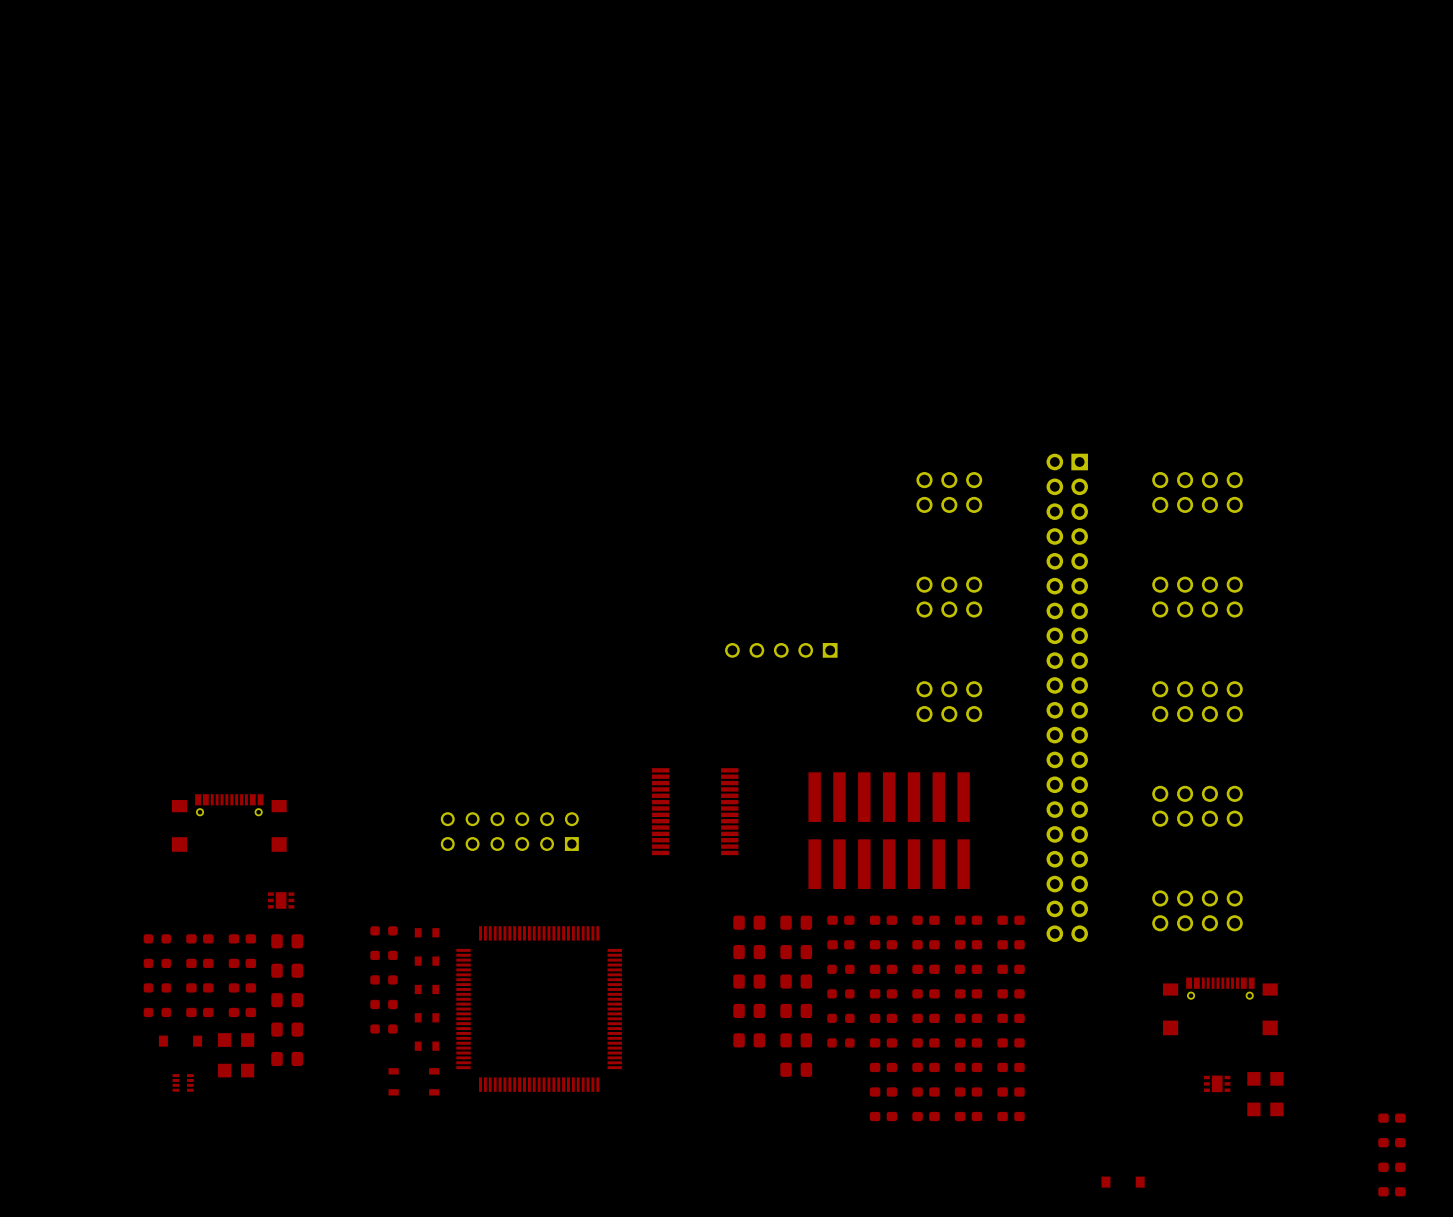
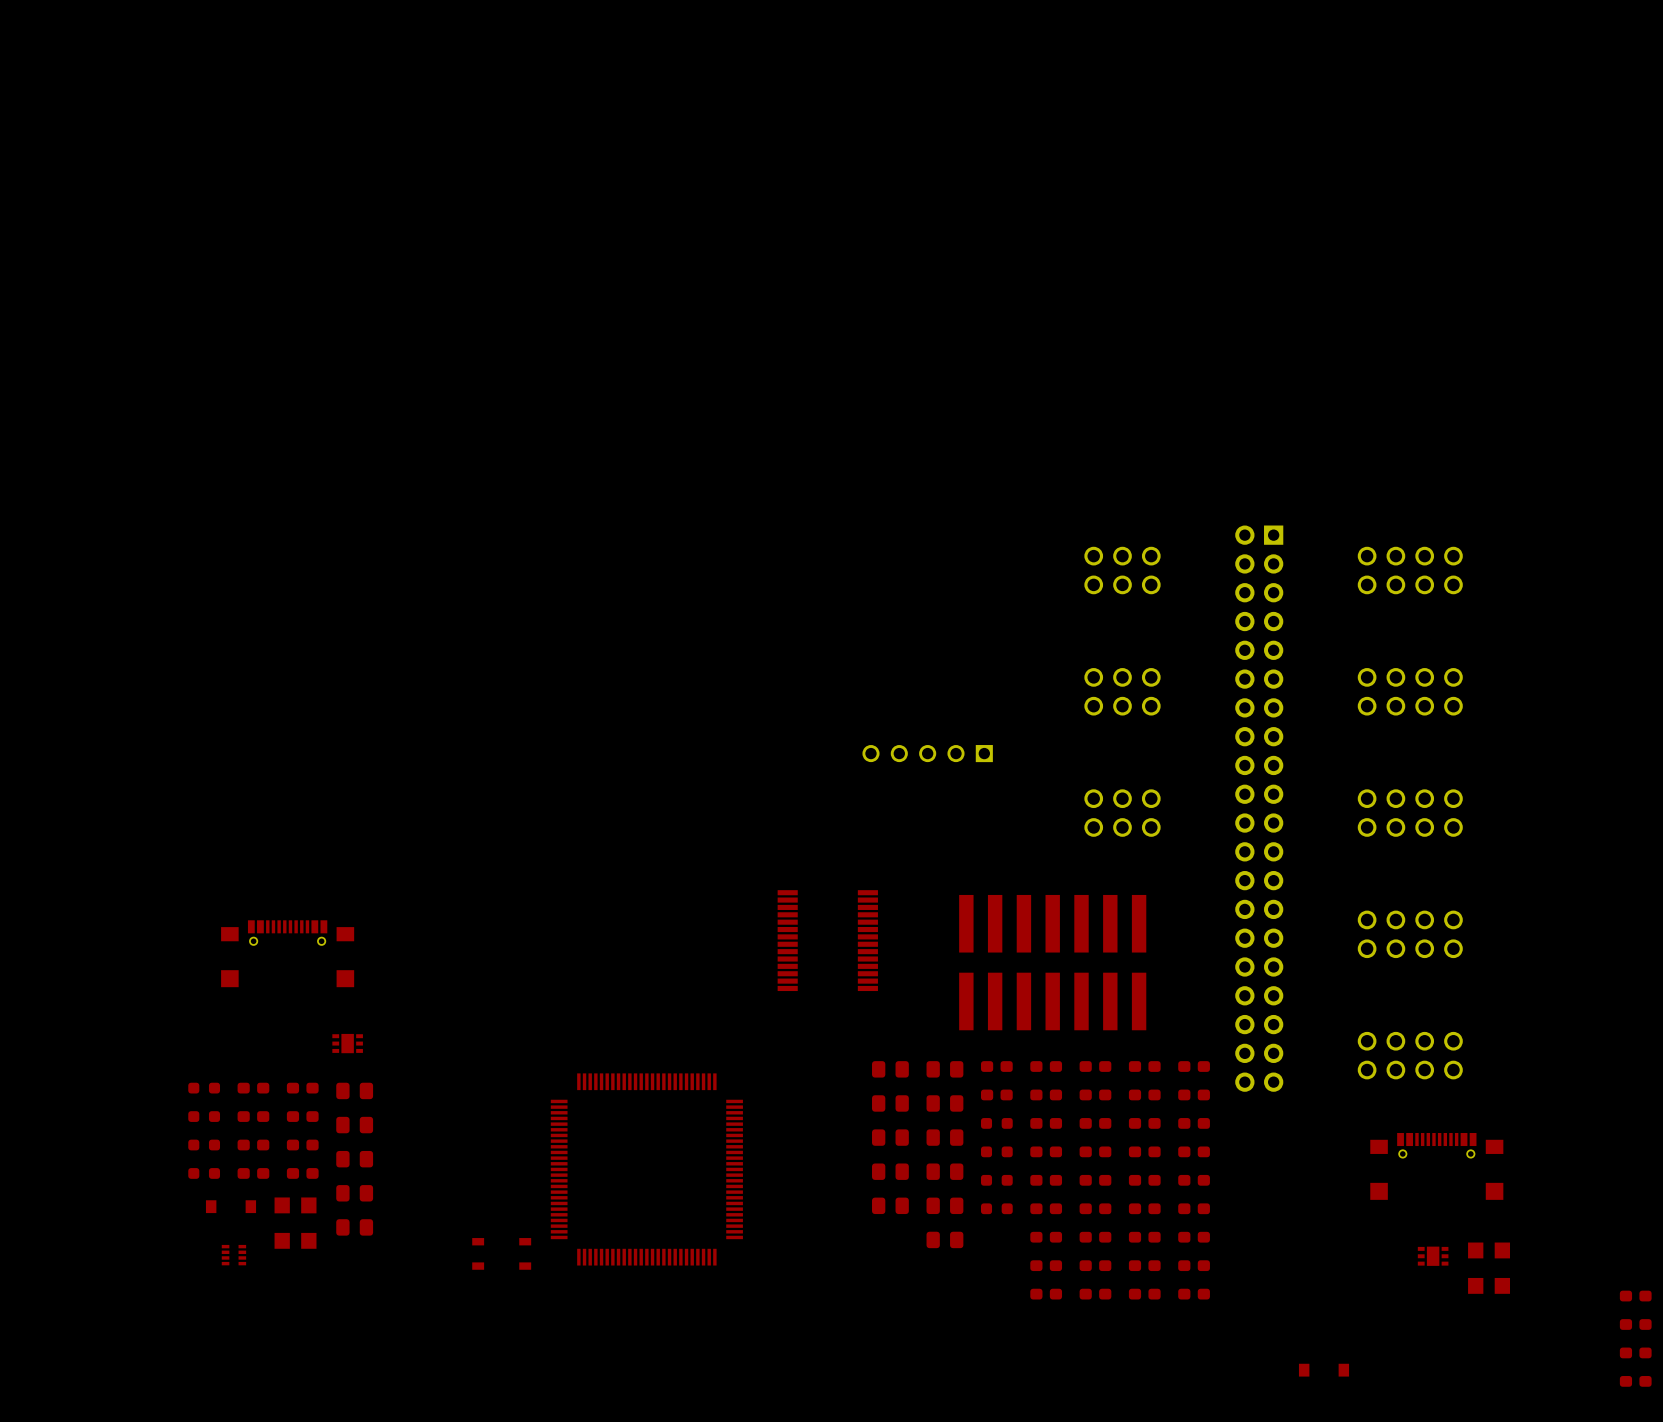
part: (509, 831) -> none
part: (383, 930) -> none
part: (426, 932) -> none
part: (383, 955) -> none
part: (426, 961) -> none
part: (383, 979) -> none
part: (426, 989) -> none
part: (383, 1004) -> none
part: (426, 1017) -> none
part: (383, 1029) -> none
part: (426, 1046) -> none

